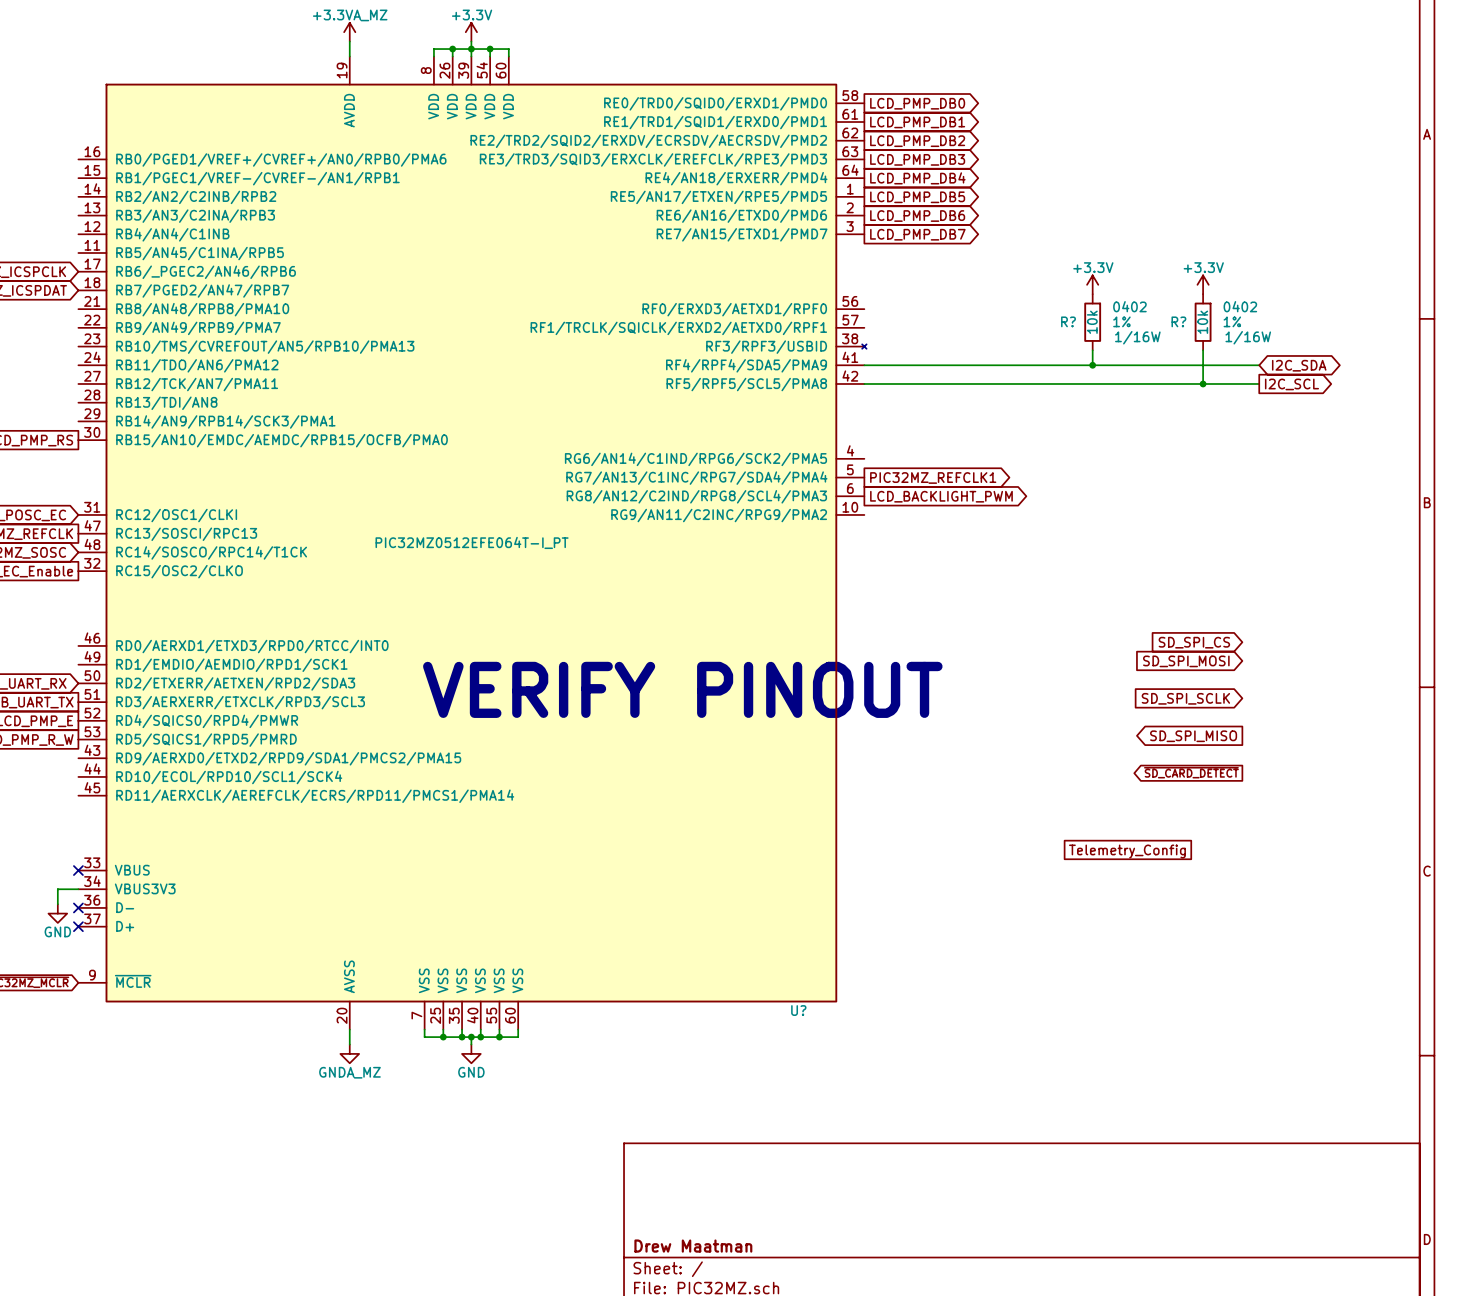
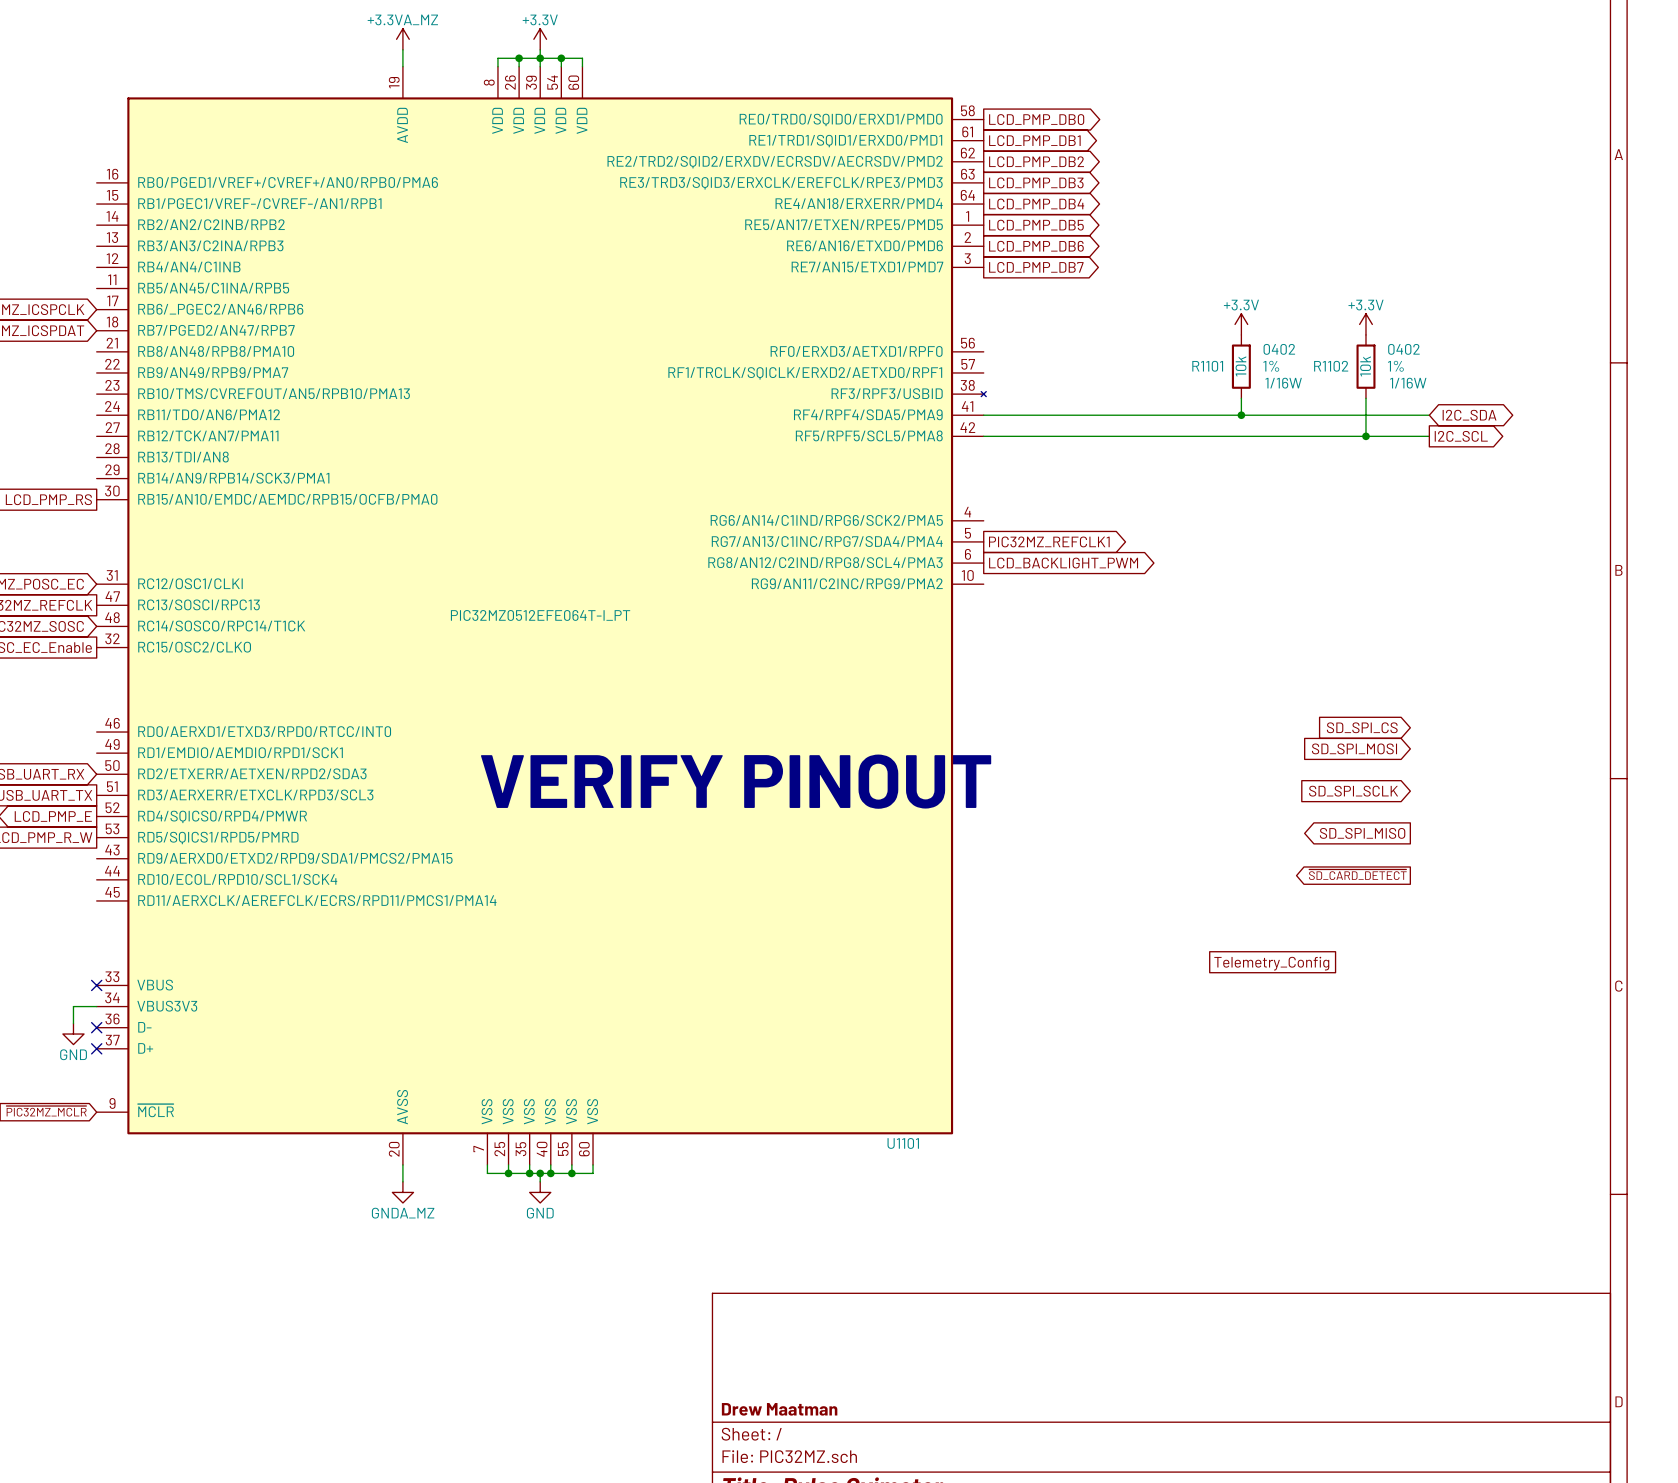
R? name: R? (1068, 321) -> R1101 (1207, 366)
R? name: R? (1178, 321) -> R1102 (1331, 366)
U? name: U? (798, 1010) -> U1101 (903, 1143)

